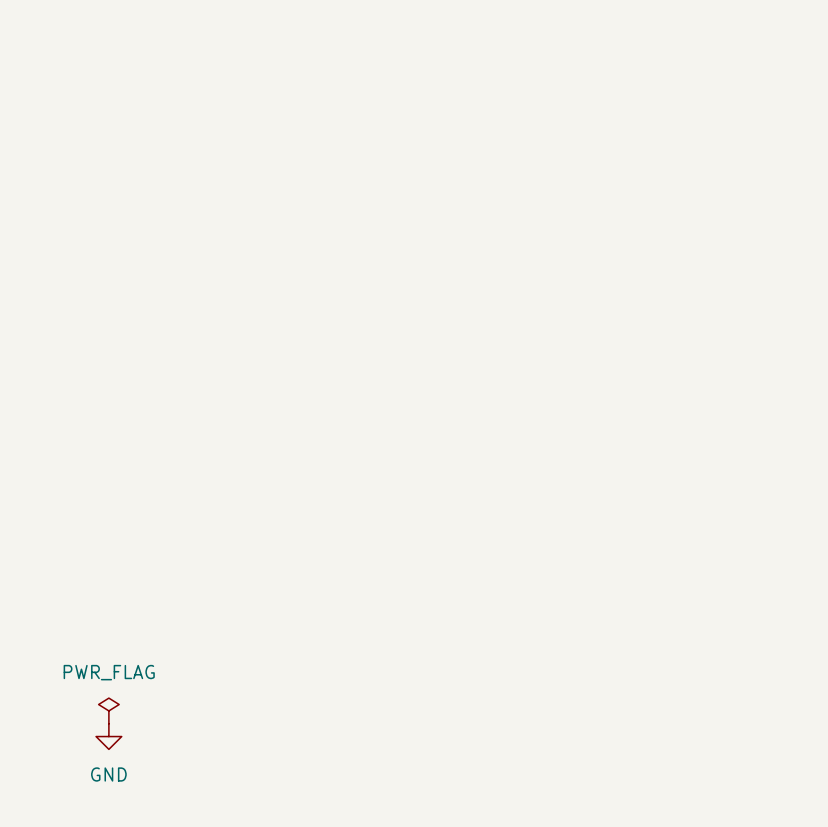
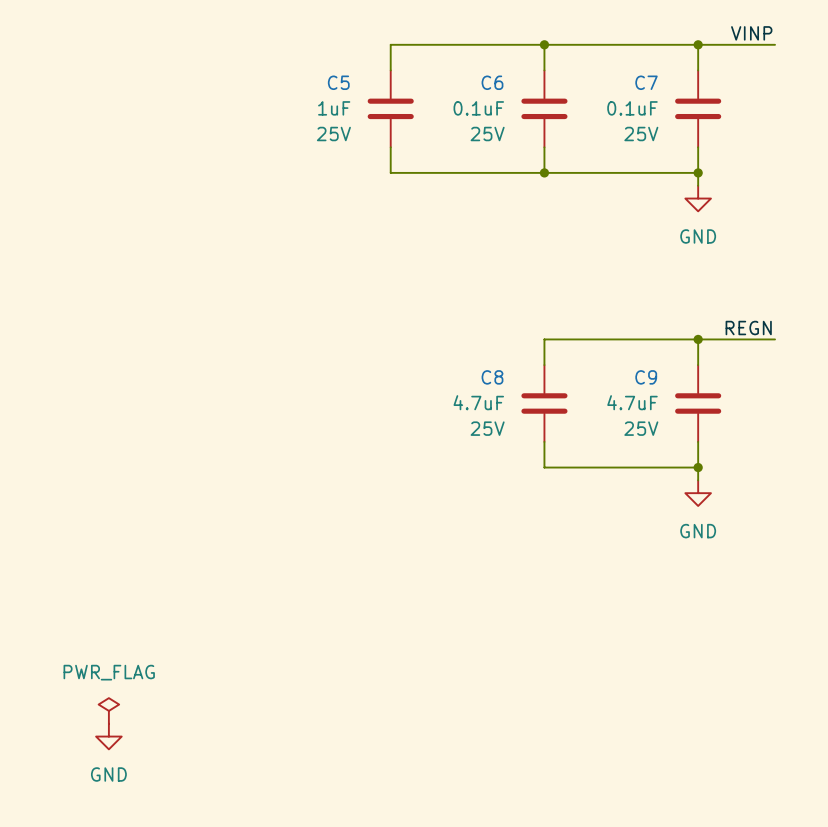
label: none -> VINP (751, 33)
wire: none -> (544, 44) (544, 70)
junction: none -> (544, 44)
wire: none -> (698, 44) (698, 70)
junction: none -> (698, 44)
wire: none -> (775, 44) (390, 44) (390, 70)
C5: none -> 1uF (390, 108)
C6: none -> 0.1uF (544, 108)
C7: none -> 0.1uF (698, 108)
wire: none -> (390, 147) (390, 172) (698, 172)
wire: none -> (544, 147) (544, 172)
wire: none -> (698, 147) (698, 185)
junction: none -> (544, 172)
junction: none -> (698, 172)
power symbol: none -> GND (698, 198)
label: none -> REGN (748, 328)
wire: none -> (698, 339) (698, 365)
junction: none -> (698, 339)
wire: none -> (775, 339) (544, 339) (544, 365)
C8: none -> 4.7uF (544, 403)
C9: none -> 4.7uF (698, 403)
wire: none -> (544, 441) (544, 467) (698, 467)
wire: none -> (698, 441) (698, 480)
junction: none -> (698, 467)
power symbol: none -> GND (698, 493)

